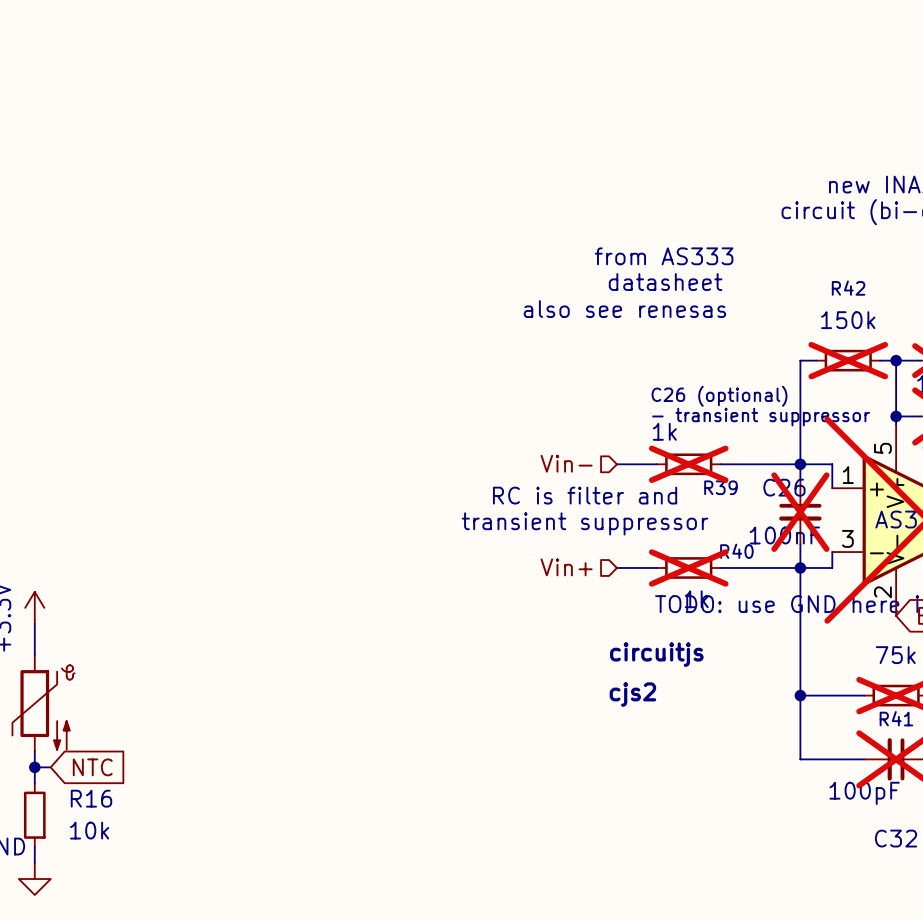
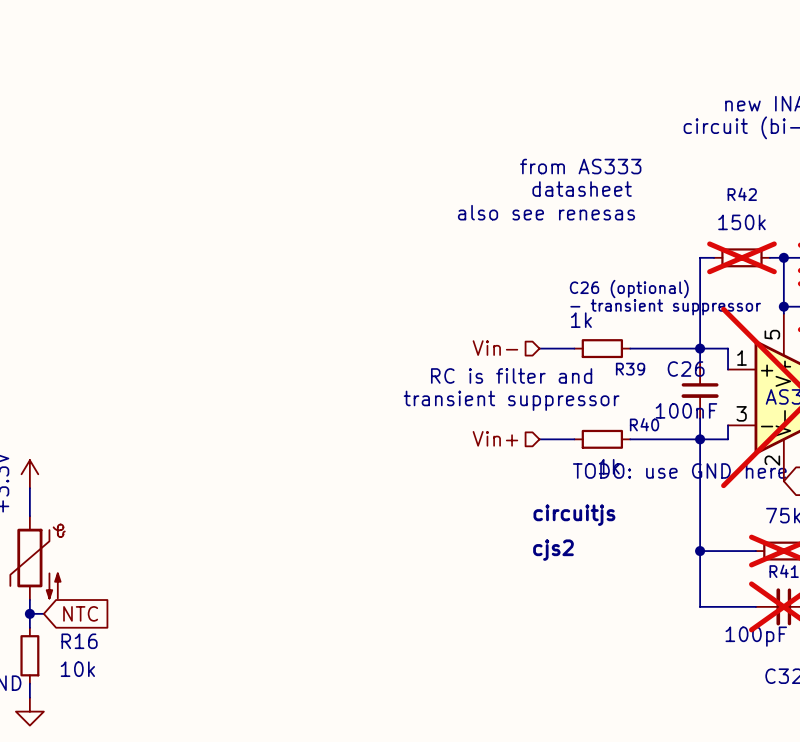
R39 do-not-place cross: (688, 464) -> none
C26 do-not-place cross: (800, 512) -> none
R40 do-not-place cross: (688, 567) -> none

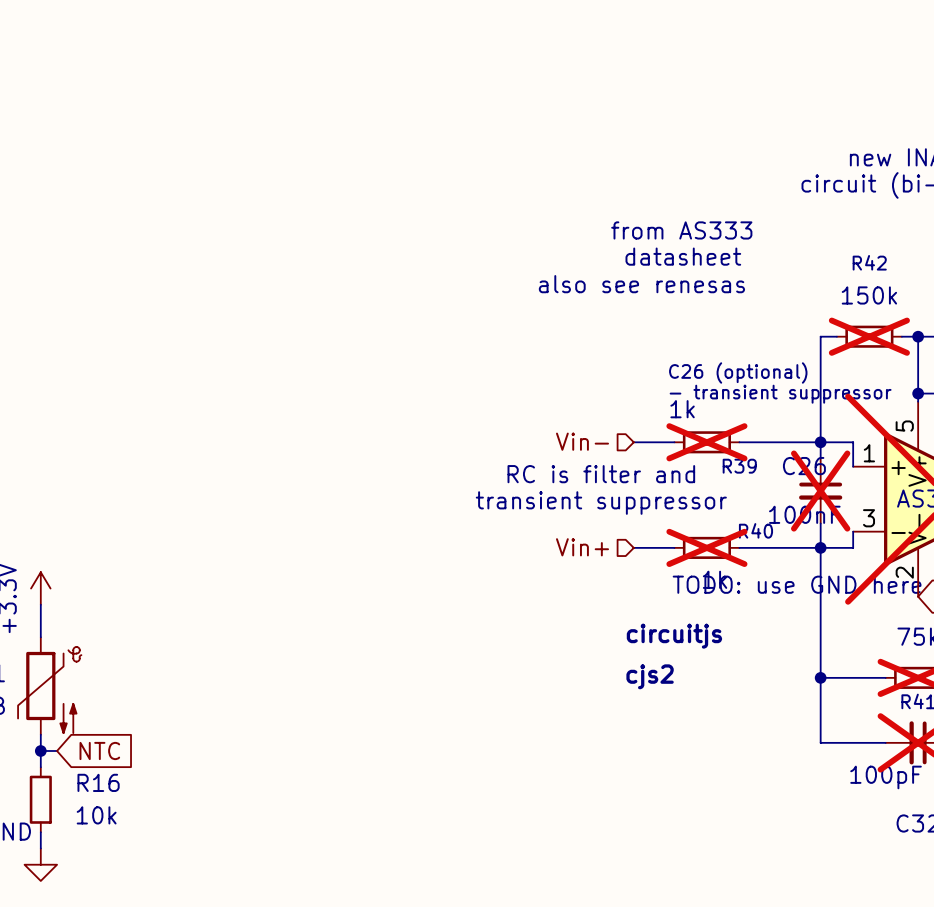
R39 do-not-place cross: none -> (706, 442)
C26 do-not-place cross: none -> (820, 491)
R40 do-not-place cross: none -> (706, 547)

